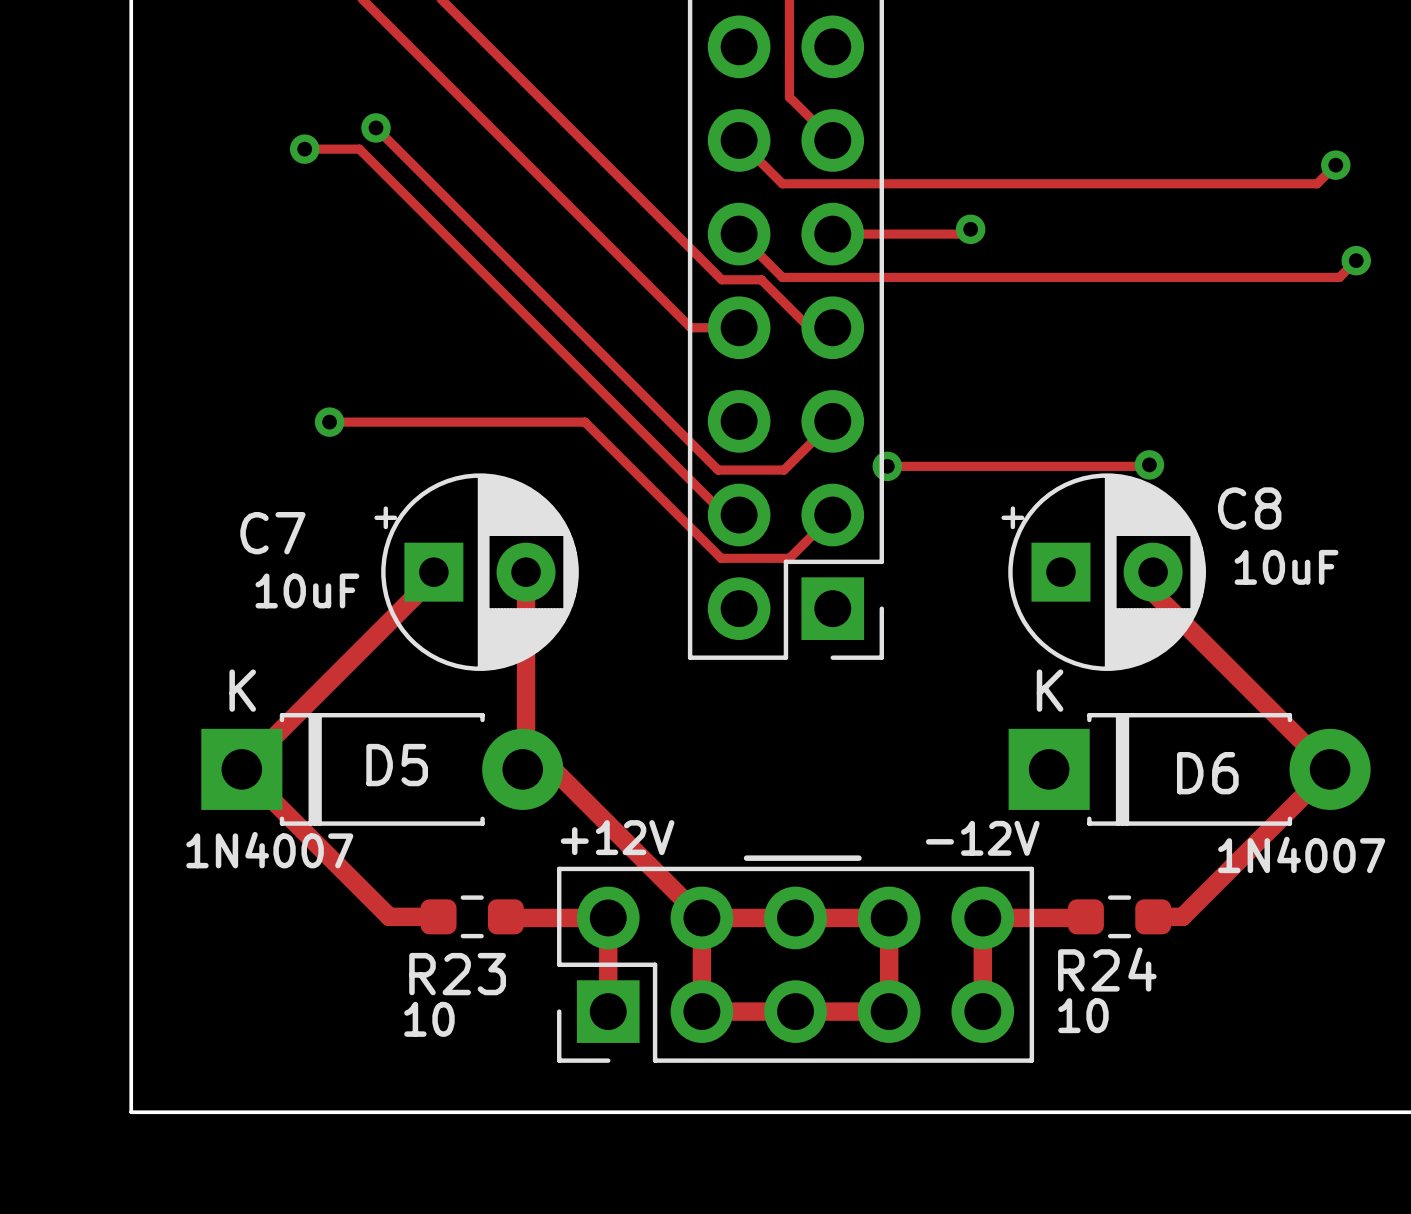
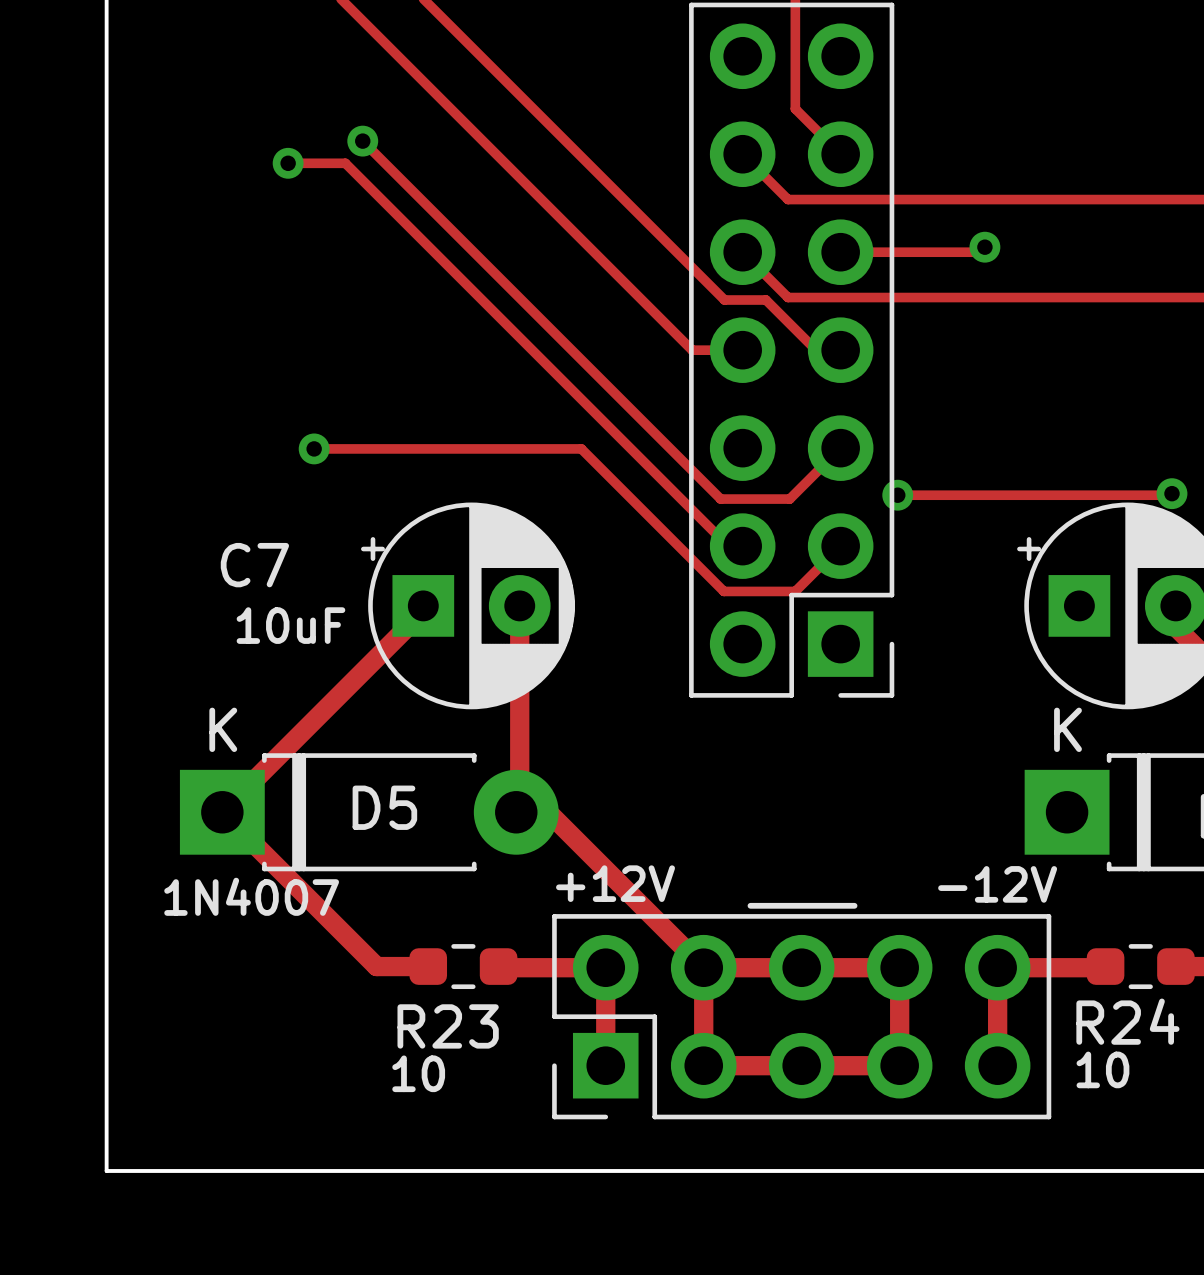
line: (746, 858) (858, 858) -> (750, 905) (854, 905)

